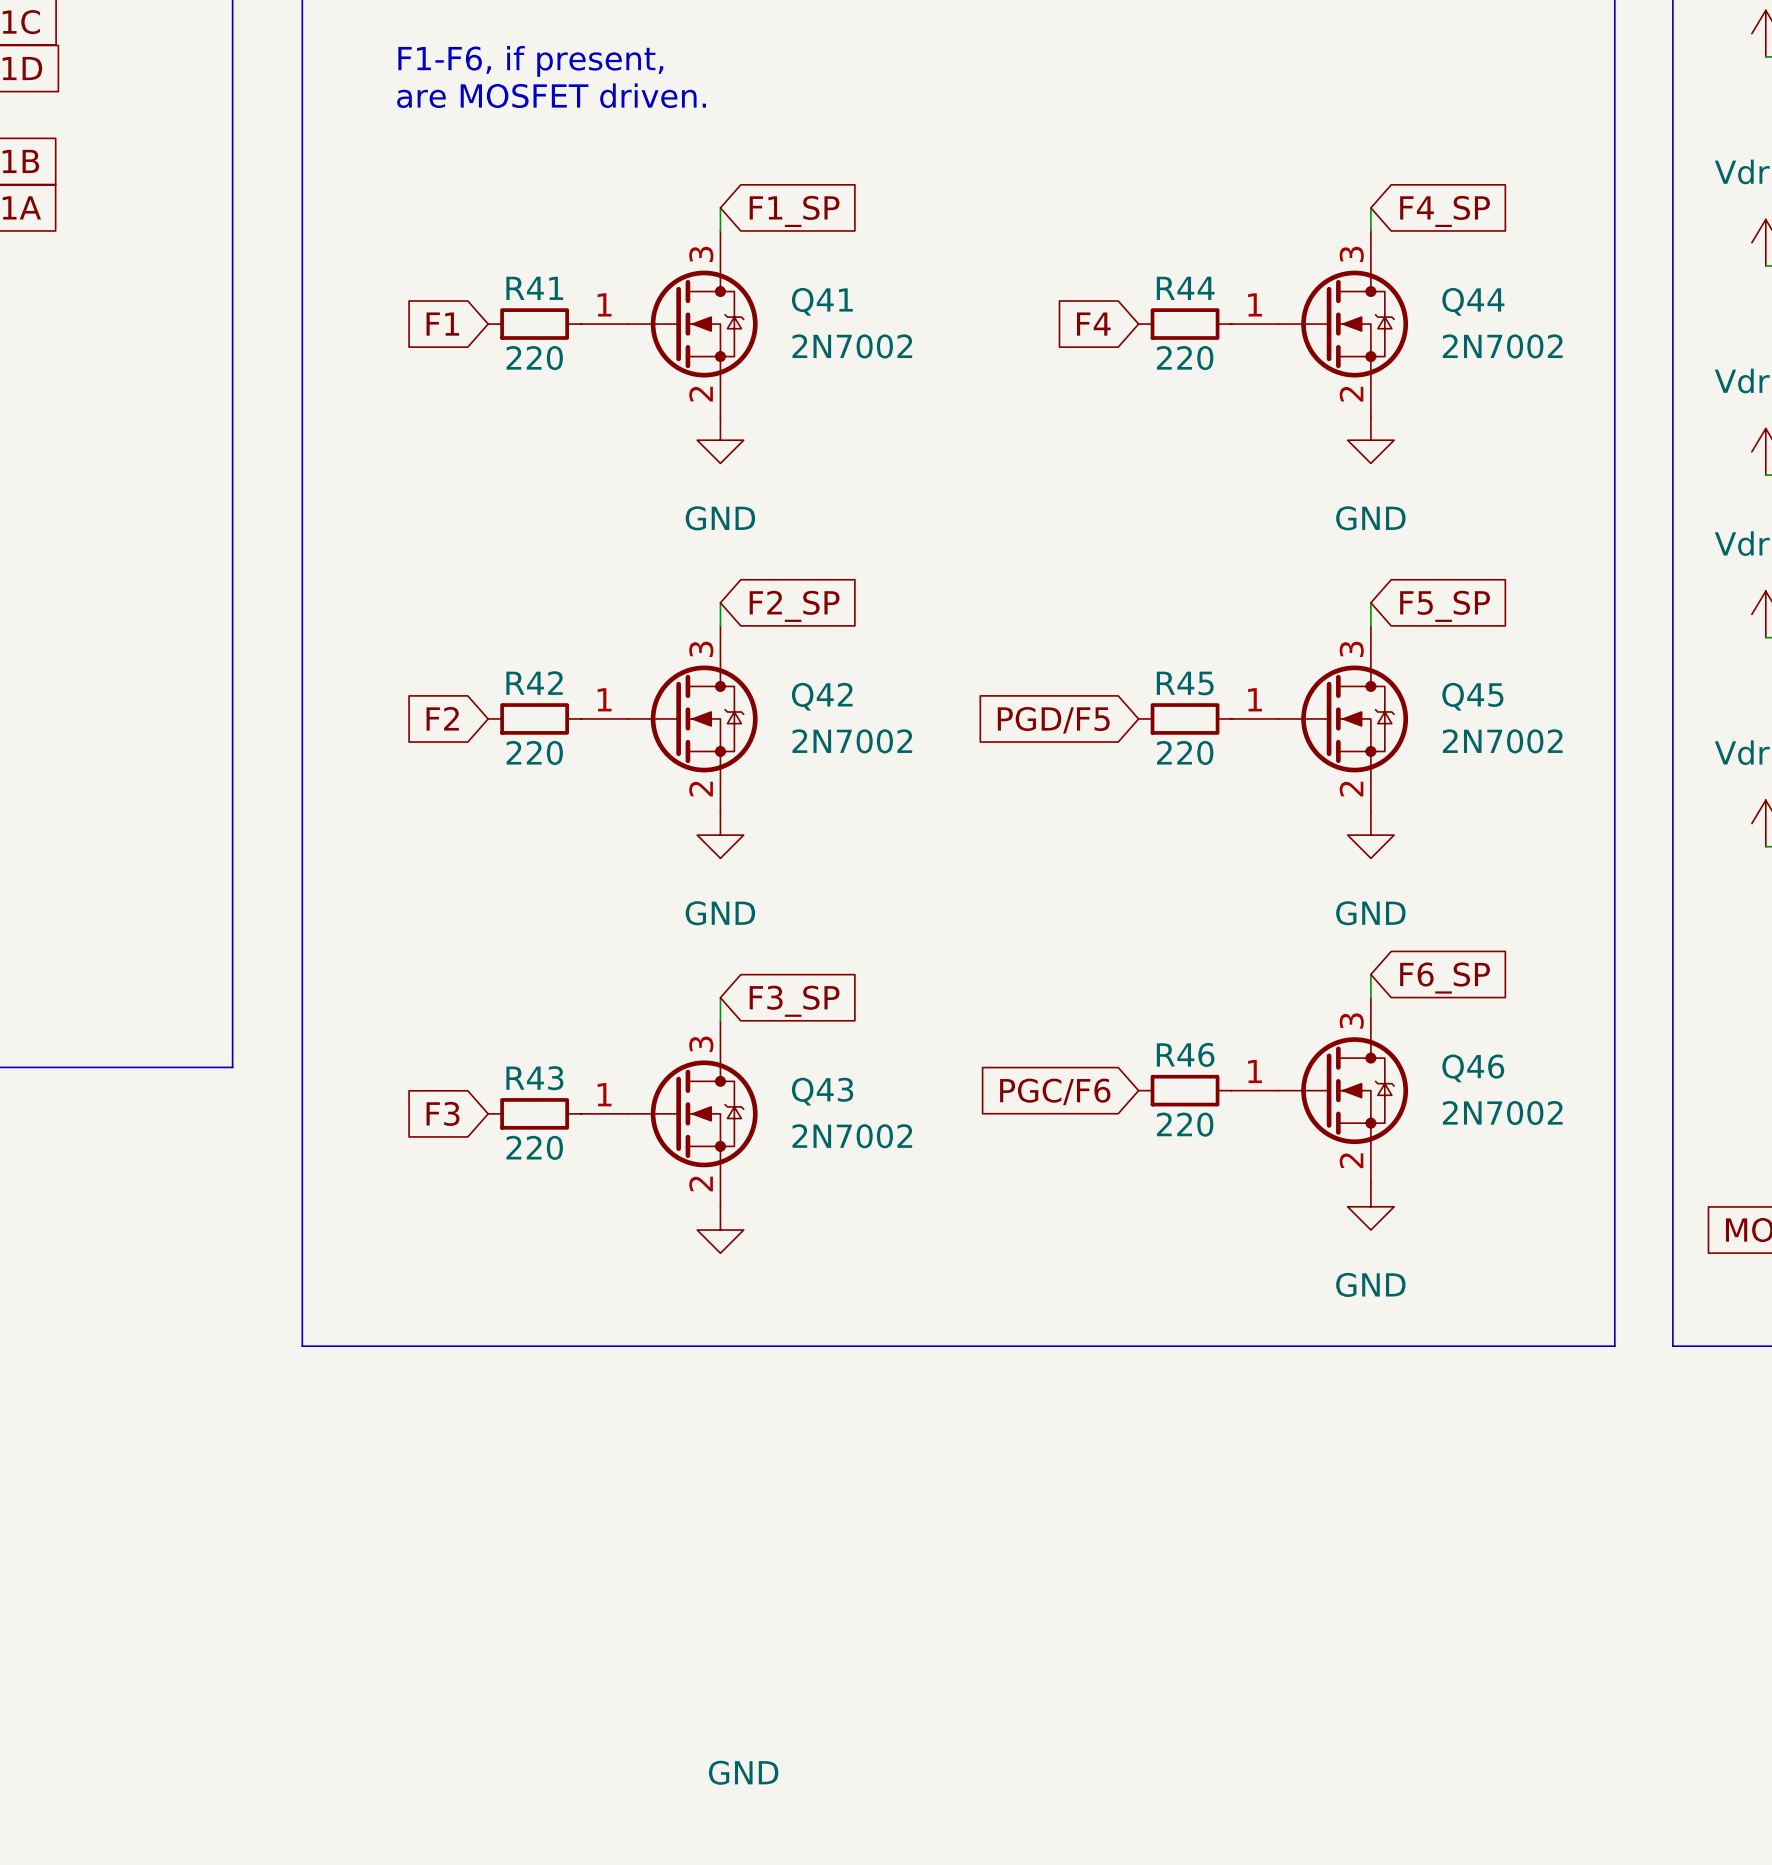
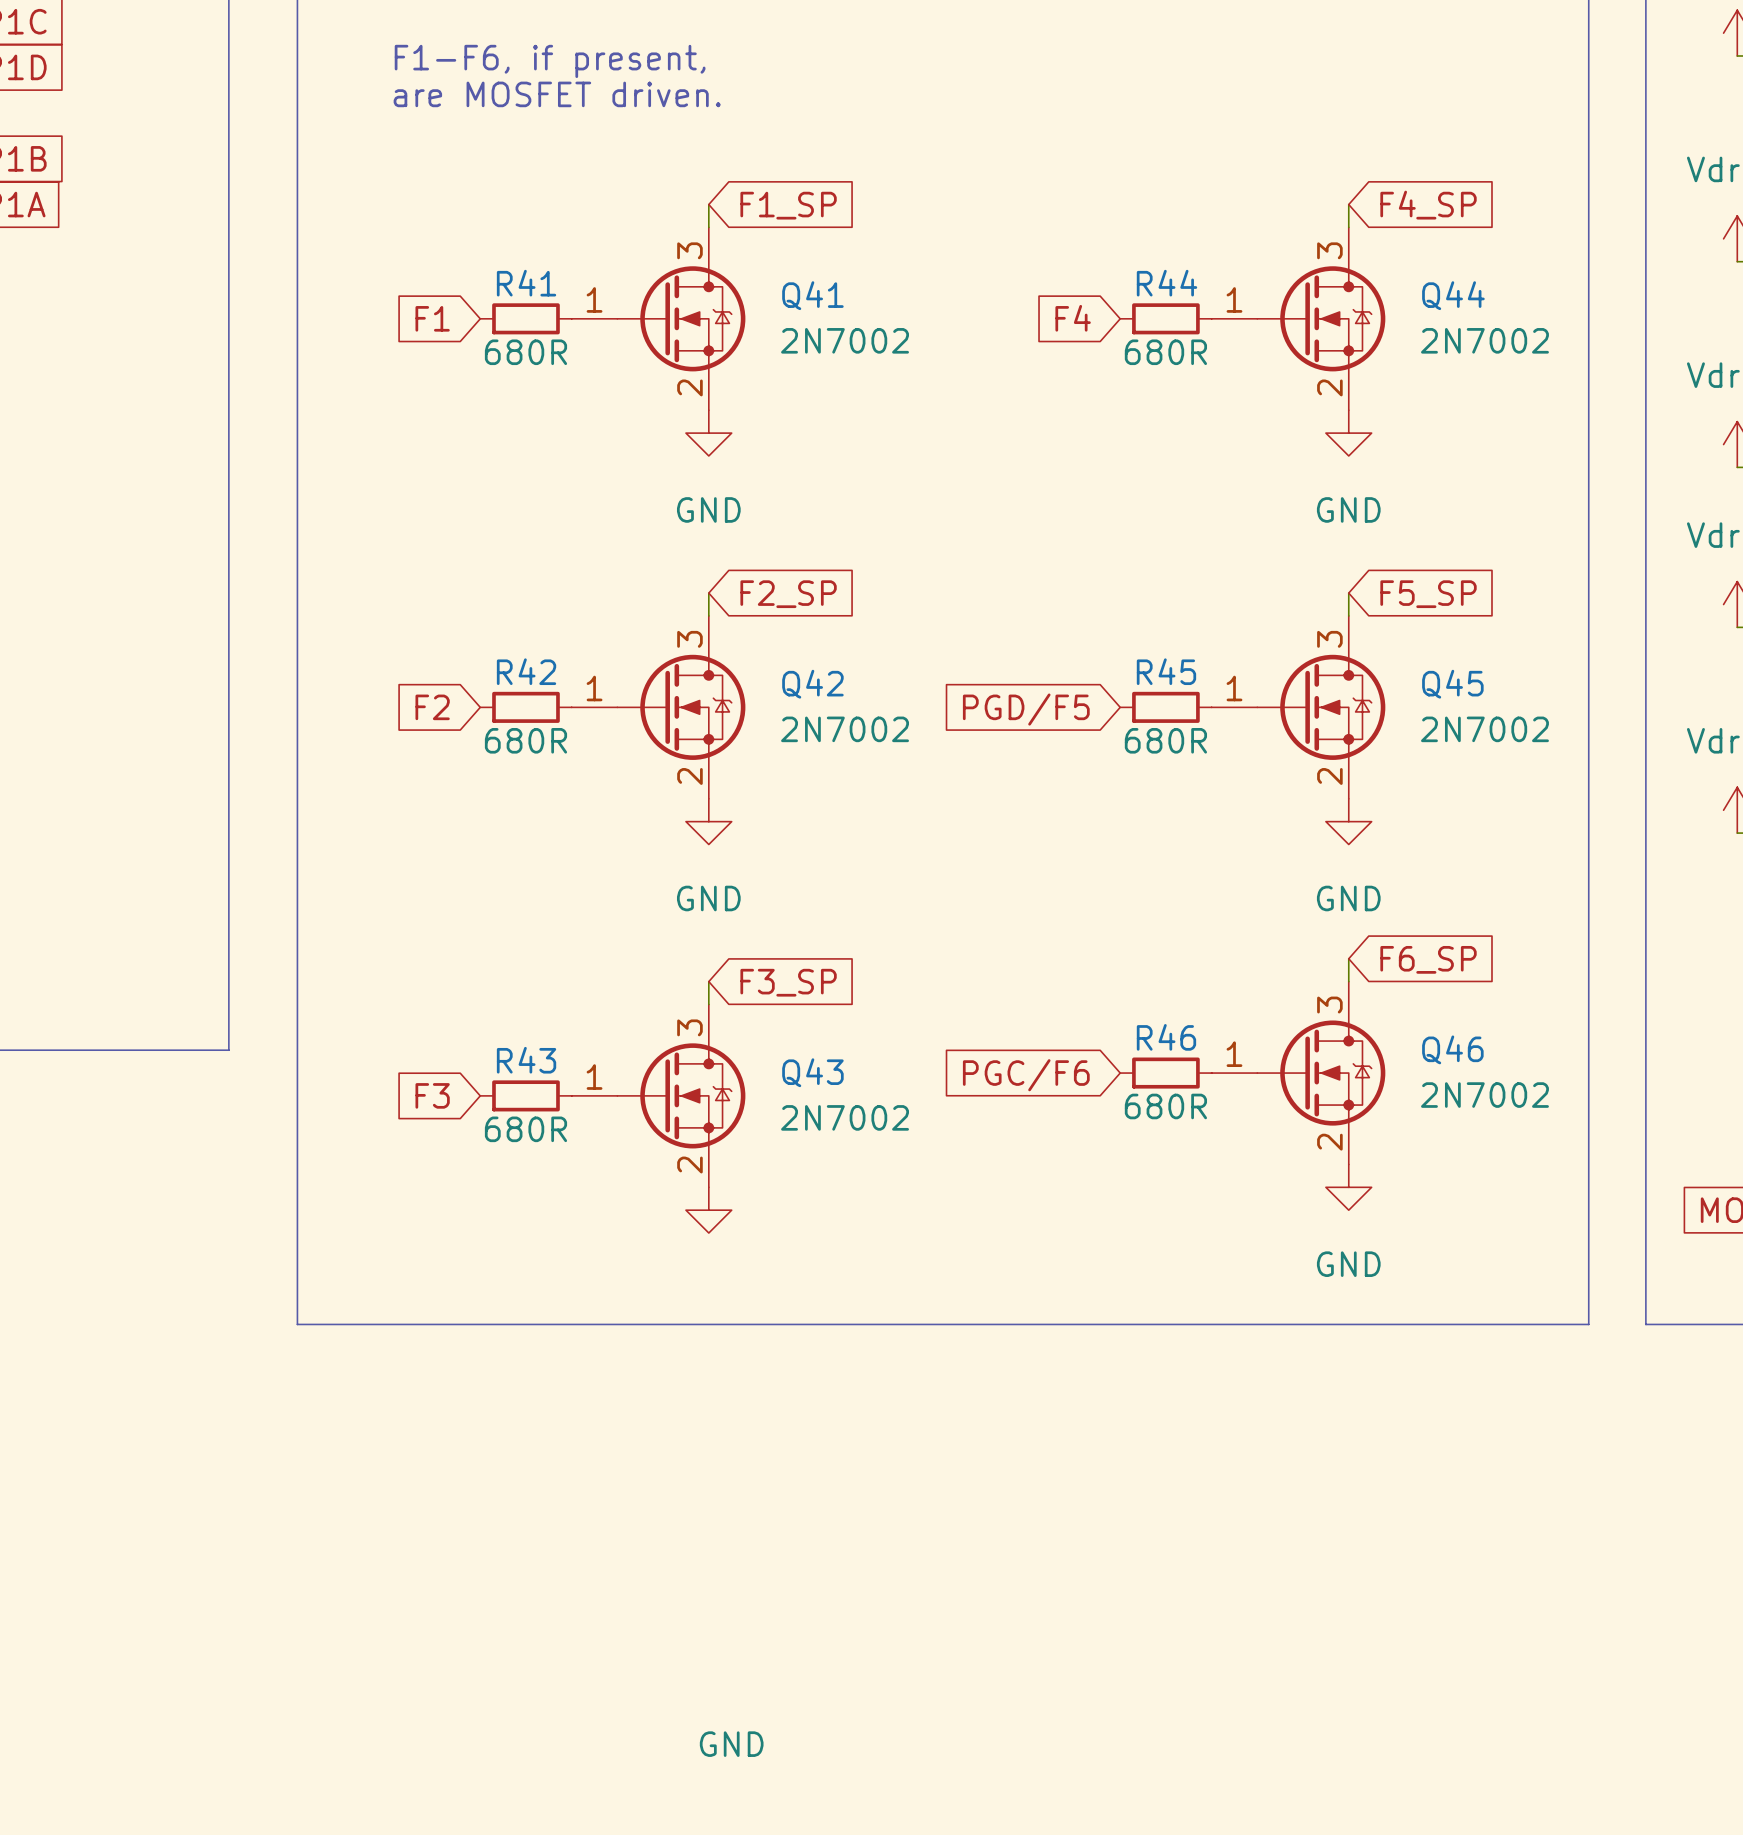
R41 value: 220 (534, 358) -> 680R (525, 352)
R44 value: 220 (1185, 358) -> 680R (1165, 352)
R42 value: 220 (534, 752) -> 680R (525, 740)
R45 value: 220 (1185, 752) -> 680R (1165, 740)
R46 value: 220 (1185, 1124) -> 680R (1165, 1106)
R43 value: 220 (534, 1147) -> 680R (525, 1129)

